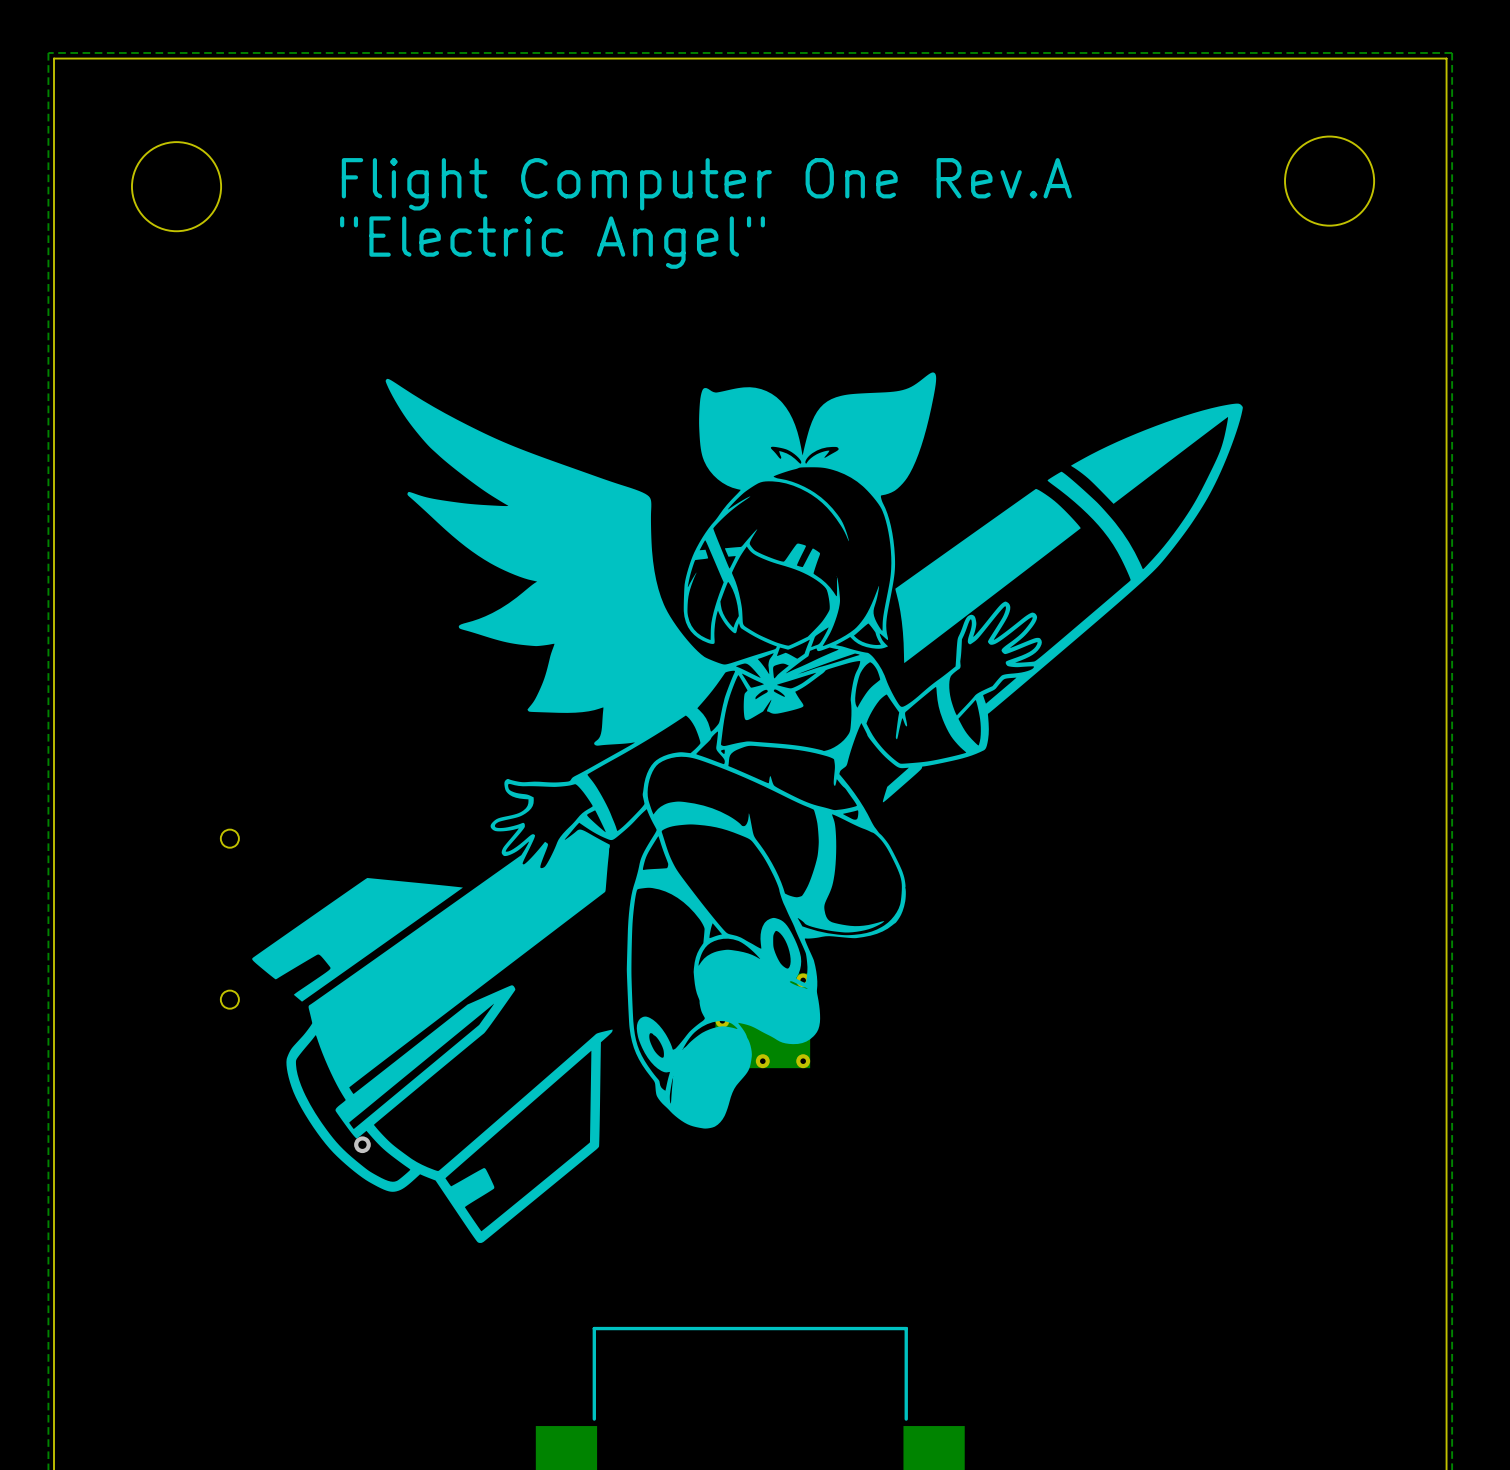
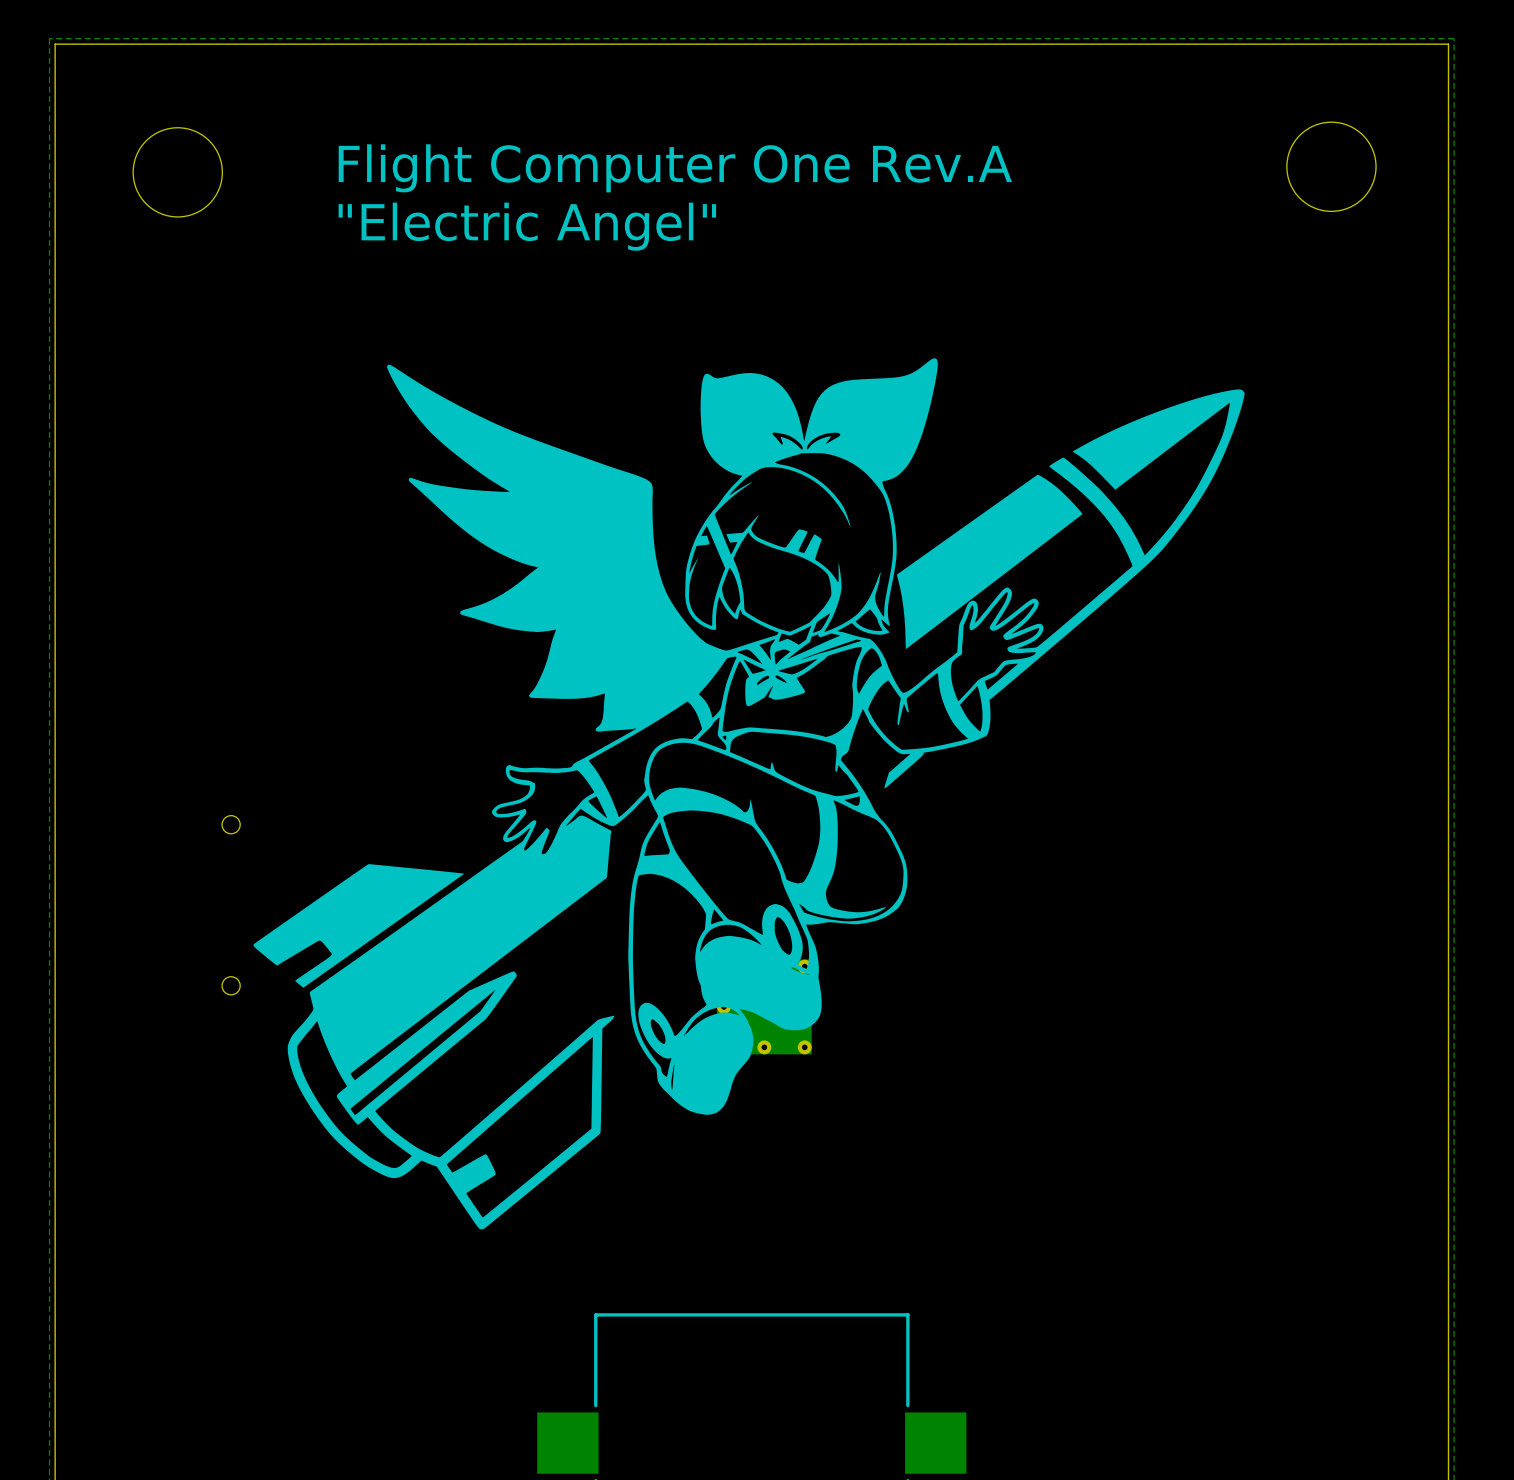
via: (362, 1144) -> none

